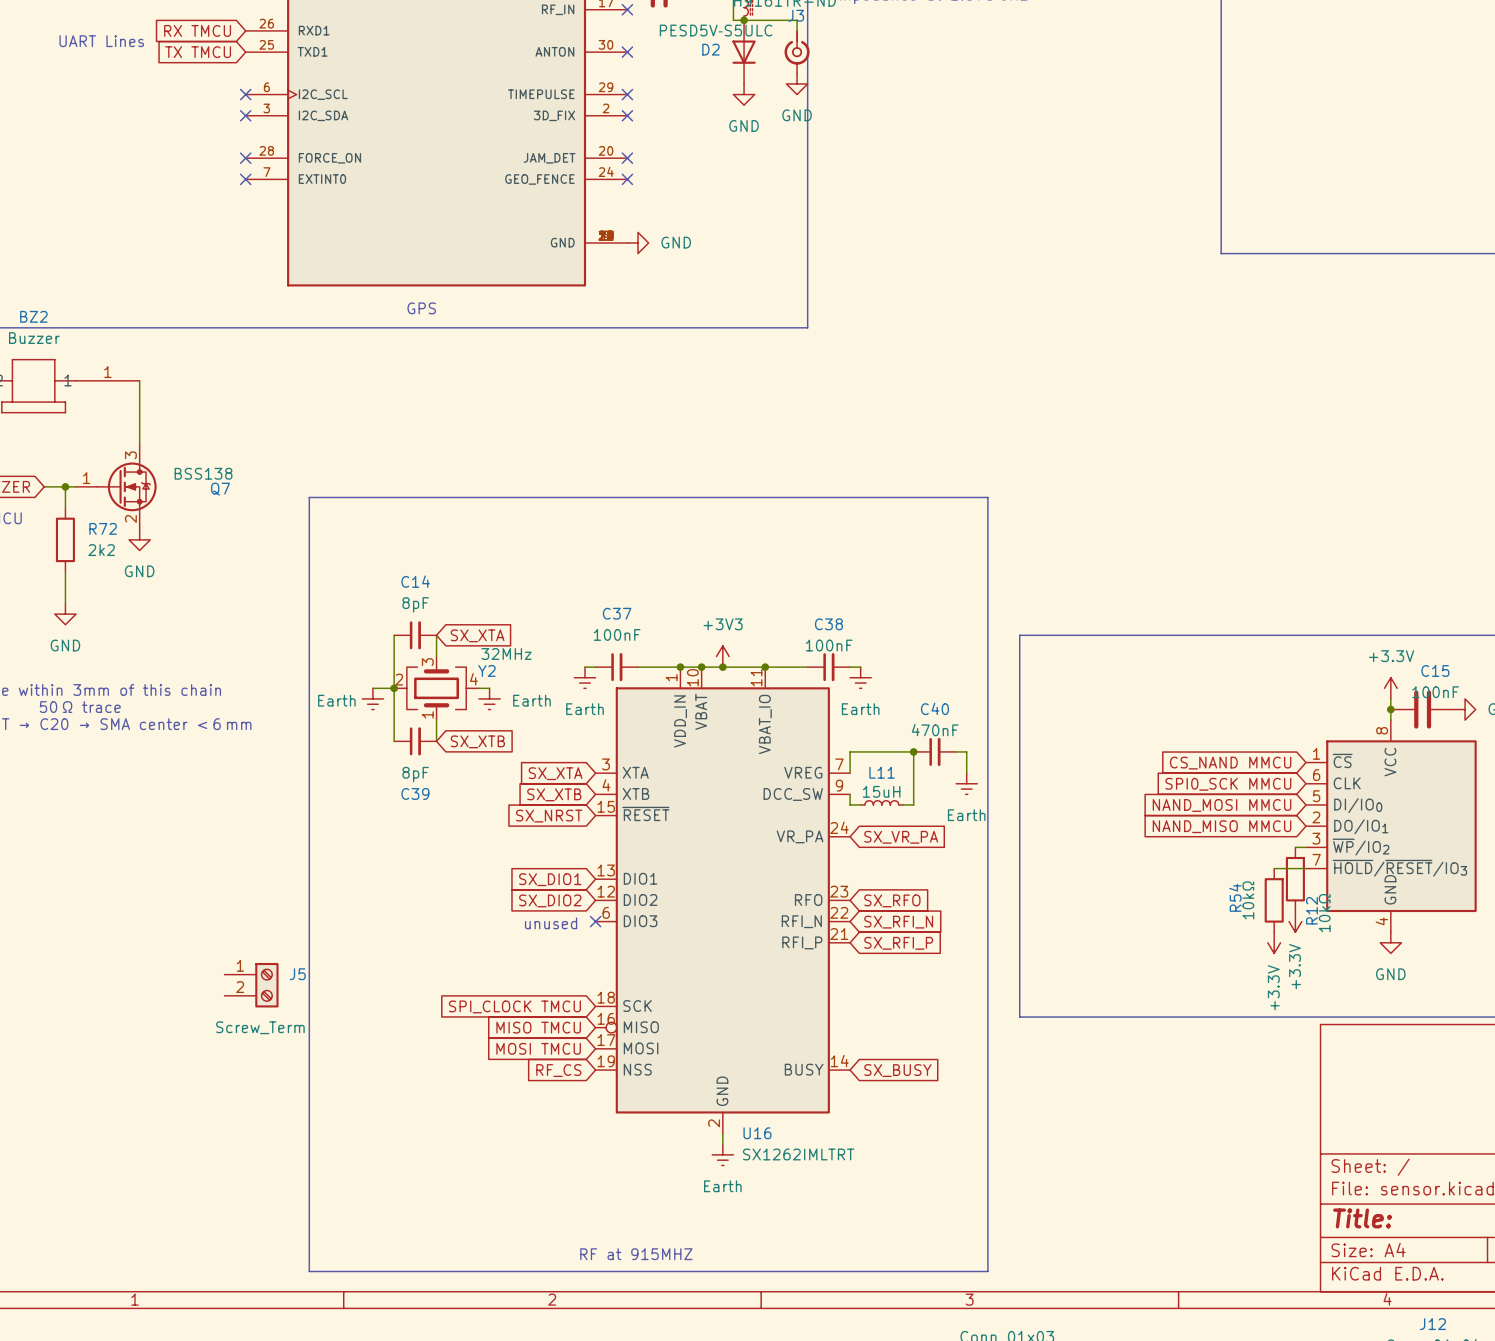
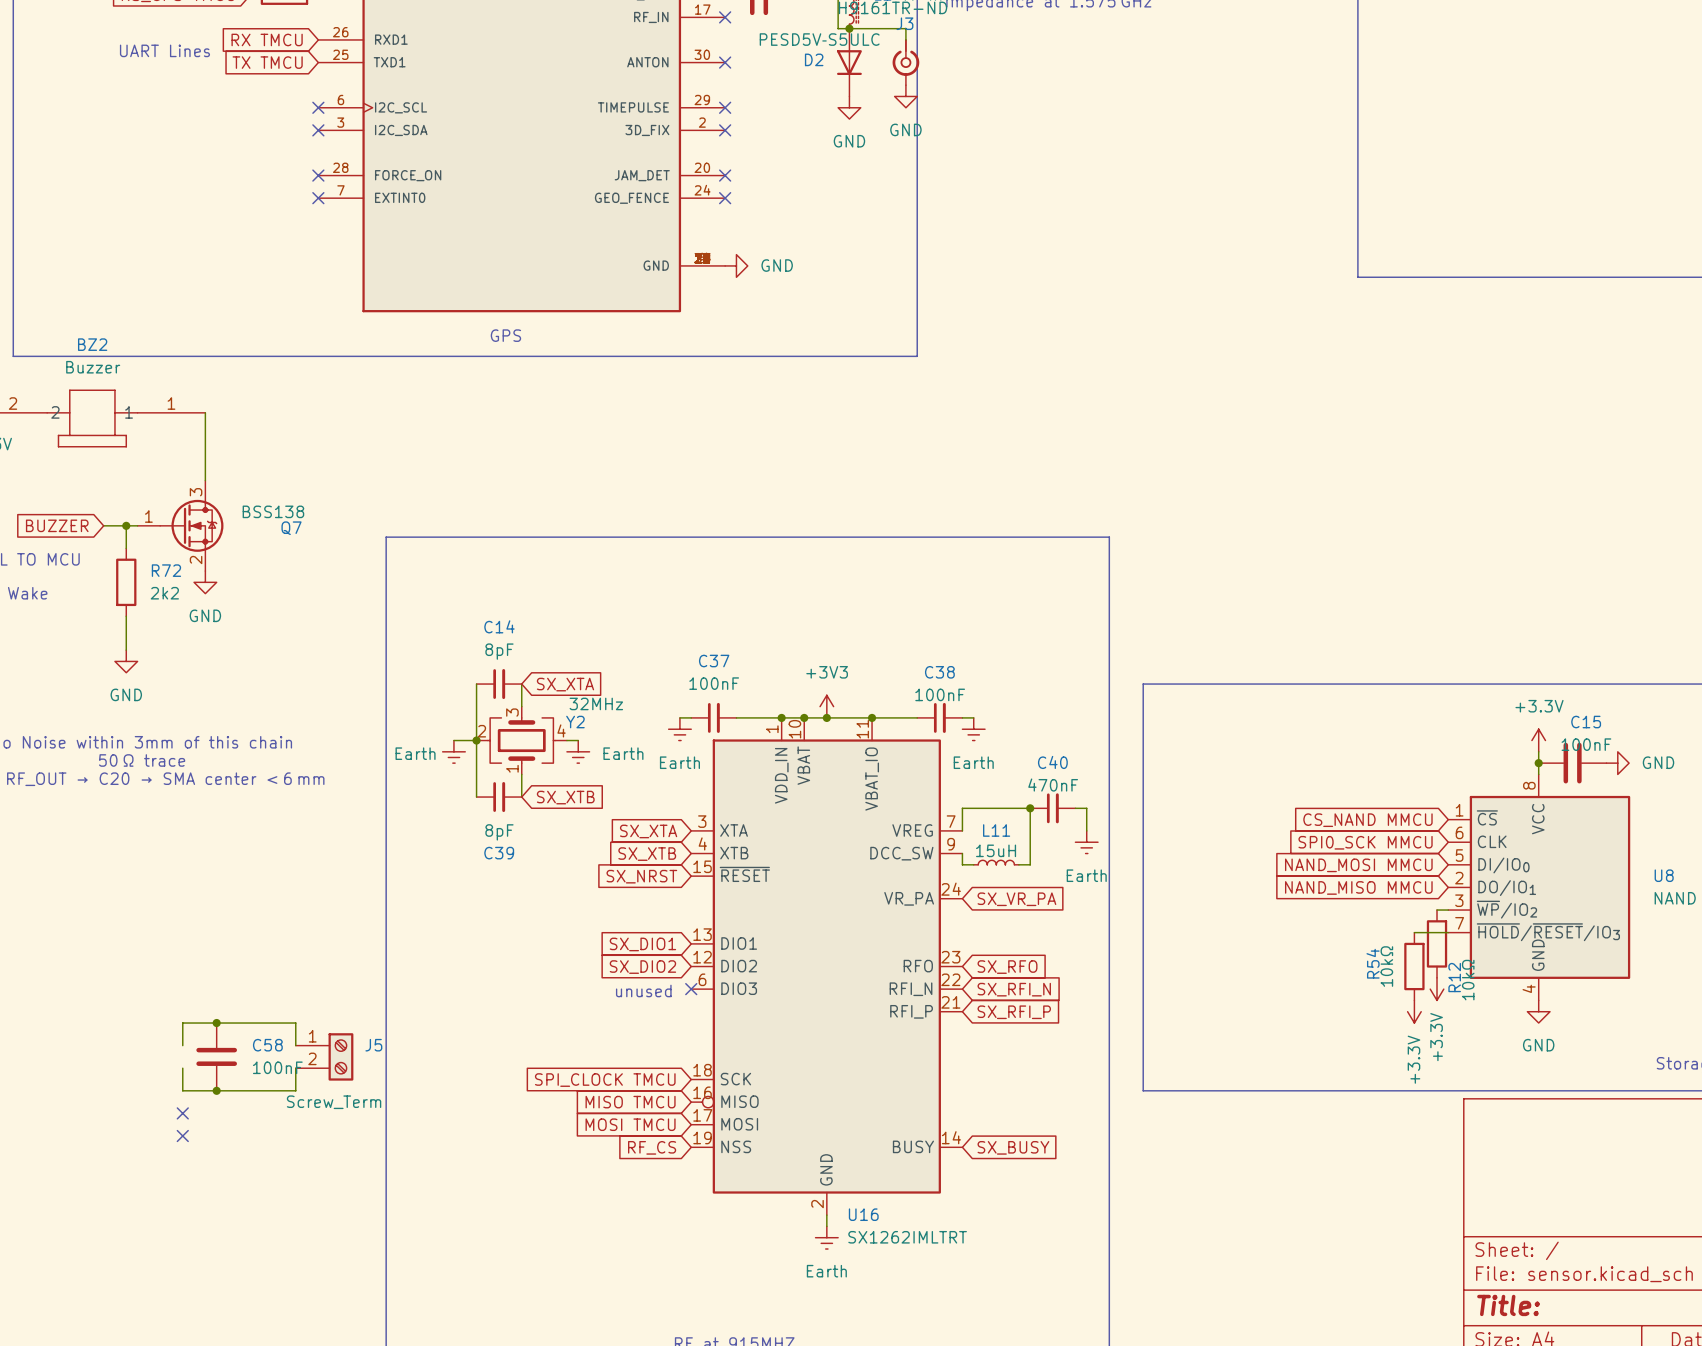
junction: none -> (216, 1023)
wire: none -> (182, 1045) (182, 1023) (295, 1023) (295, 1045)
C58: none -> 100nF (216, 1056)
wire: none -> (182, 1068) (182, 1090) (295, 1090) (295, 1068)
junction: none -> (216, 1090)
no-connect mark: none -> (182, 1113)
no-connect mark: none -> (182, 1136)

